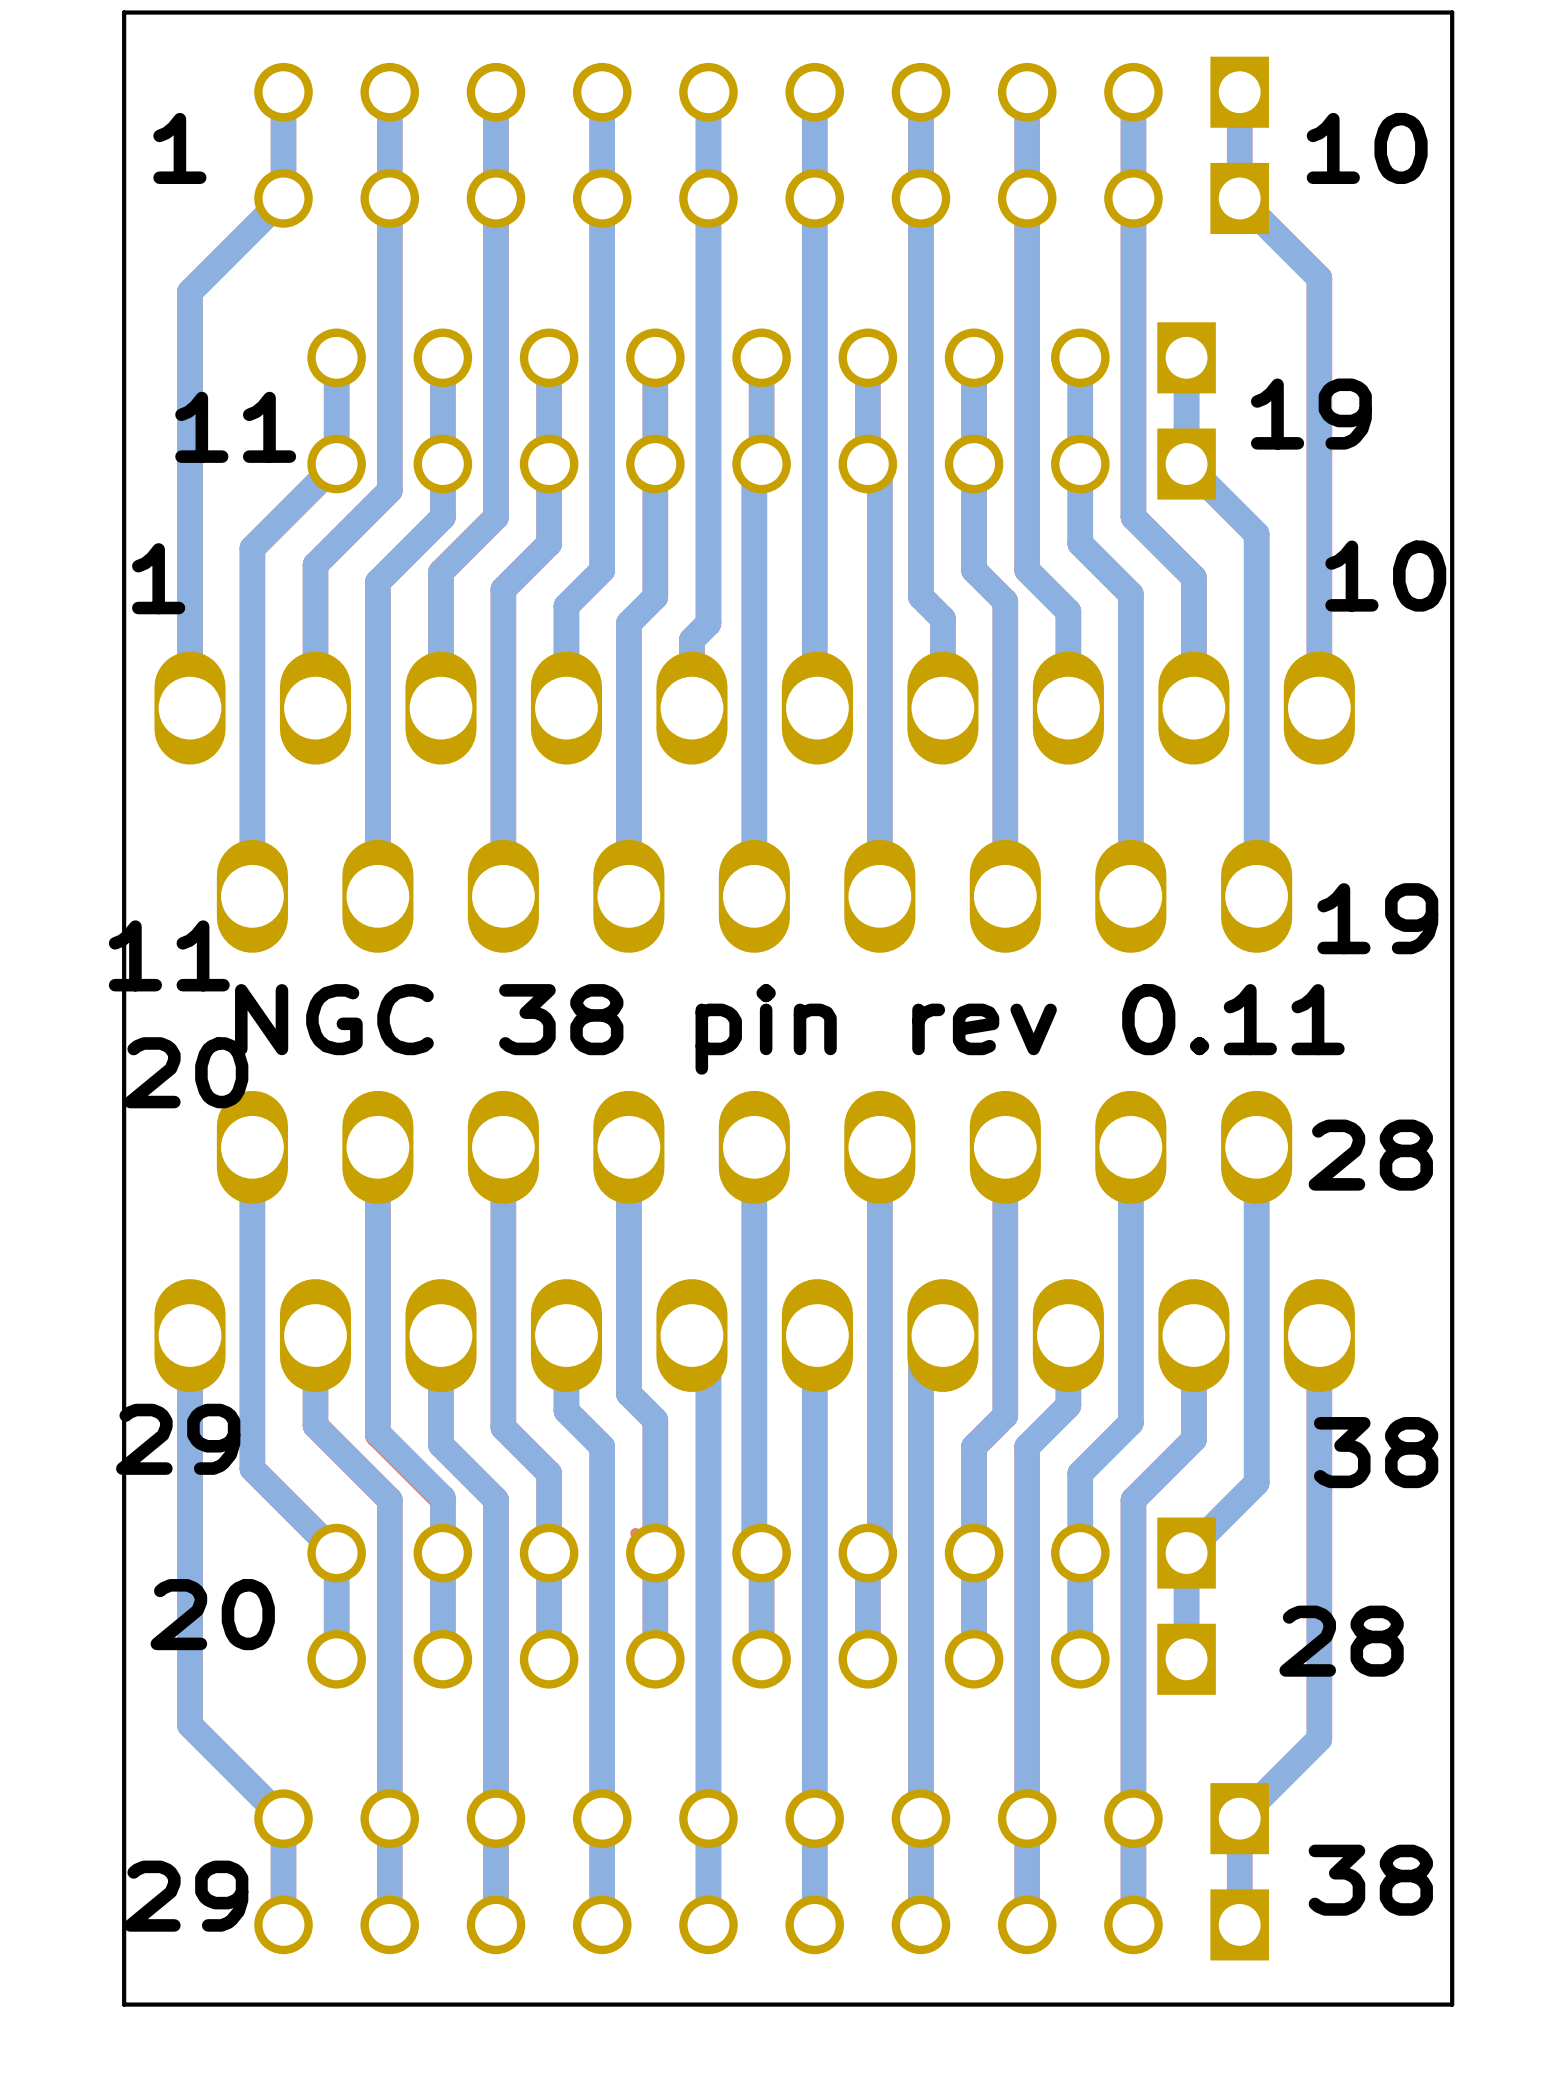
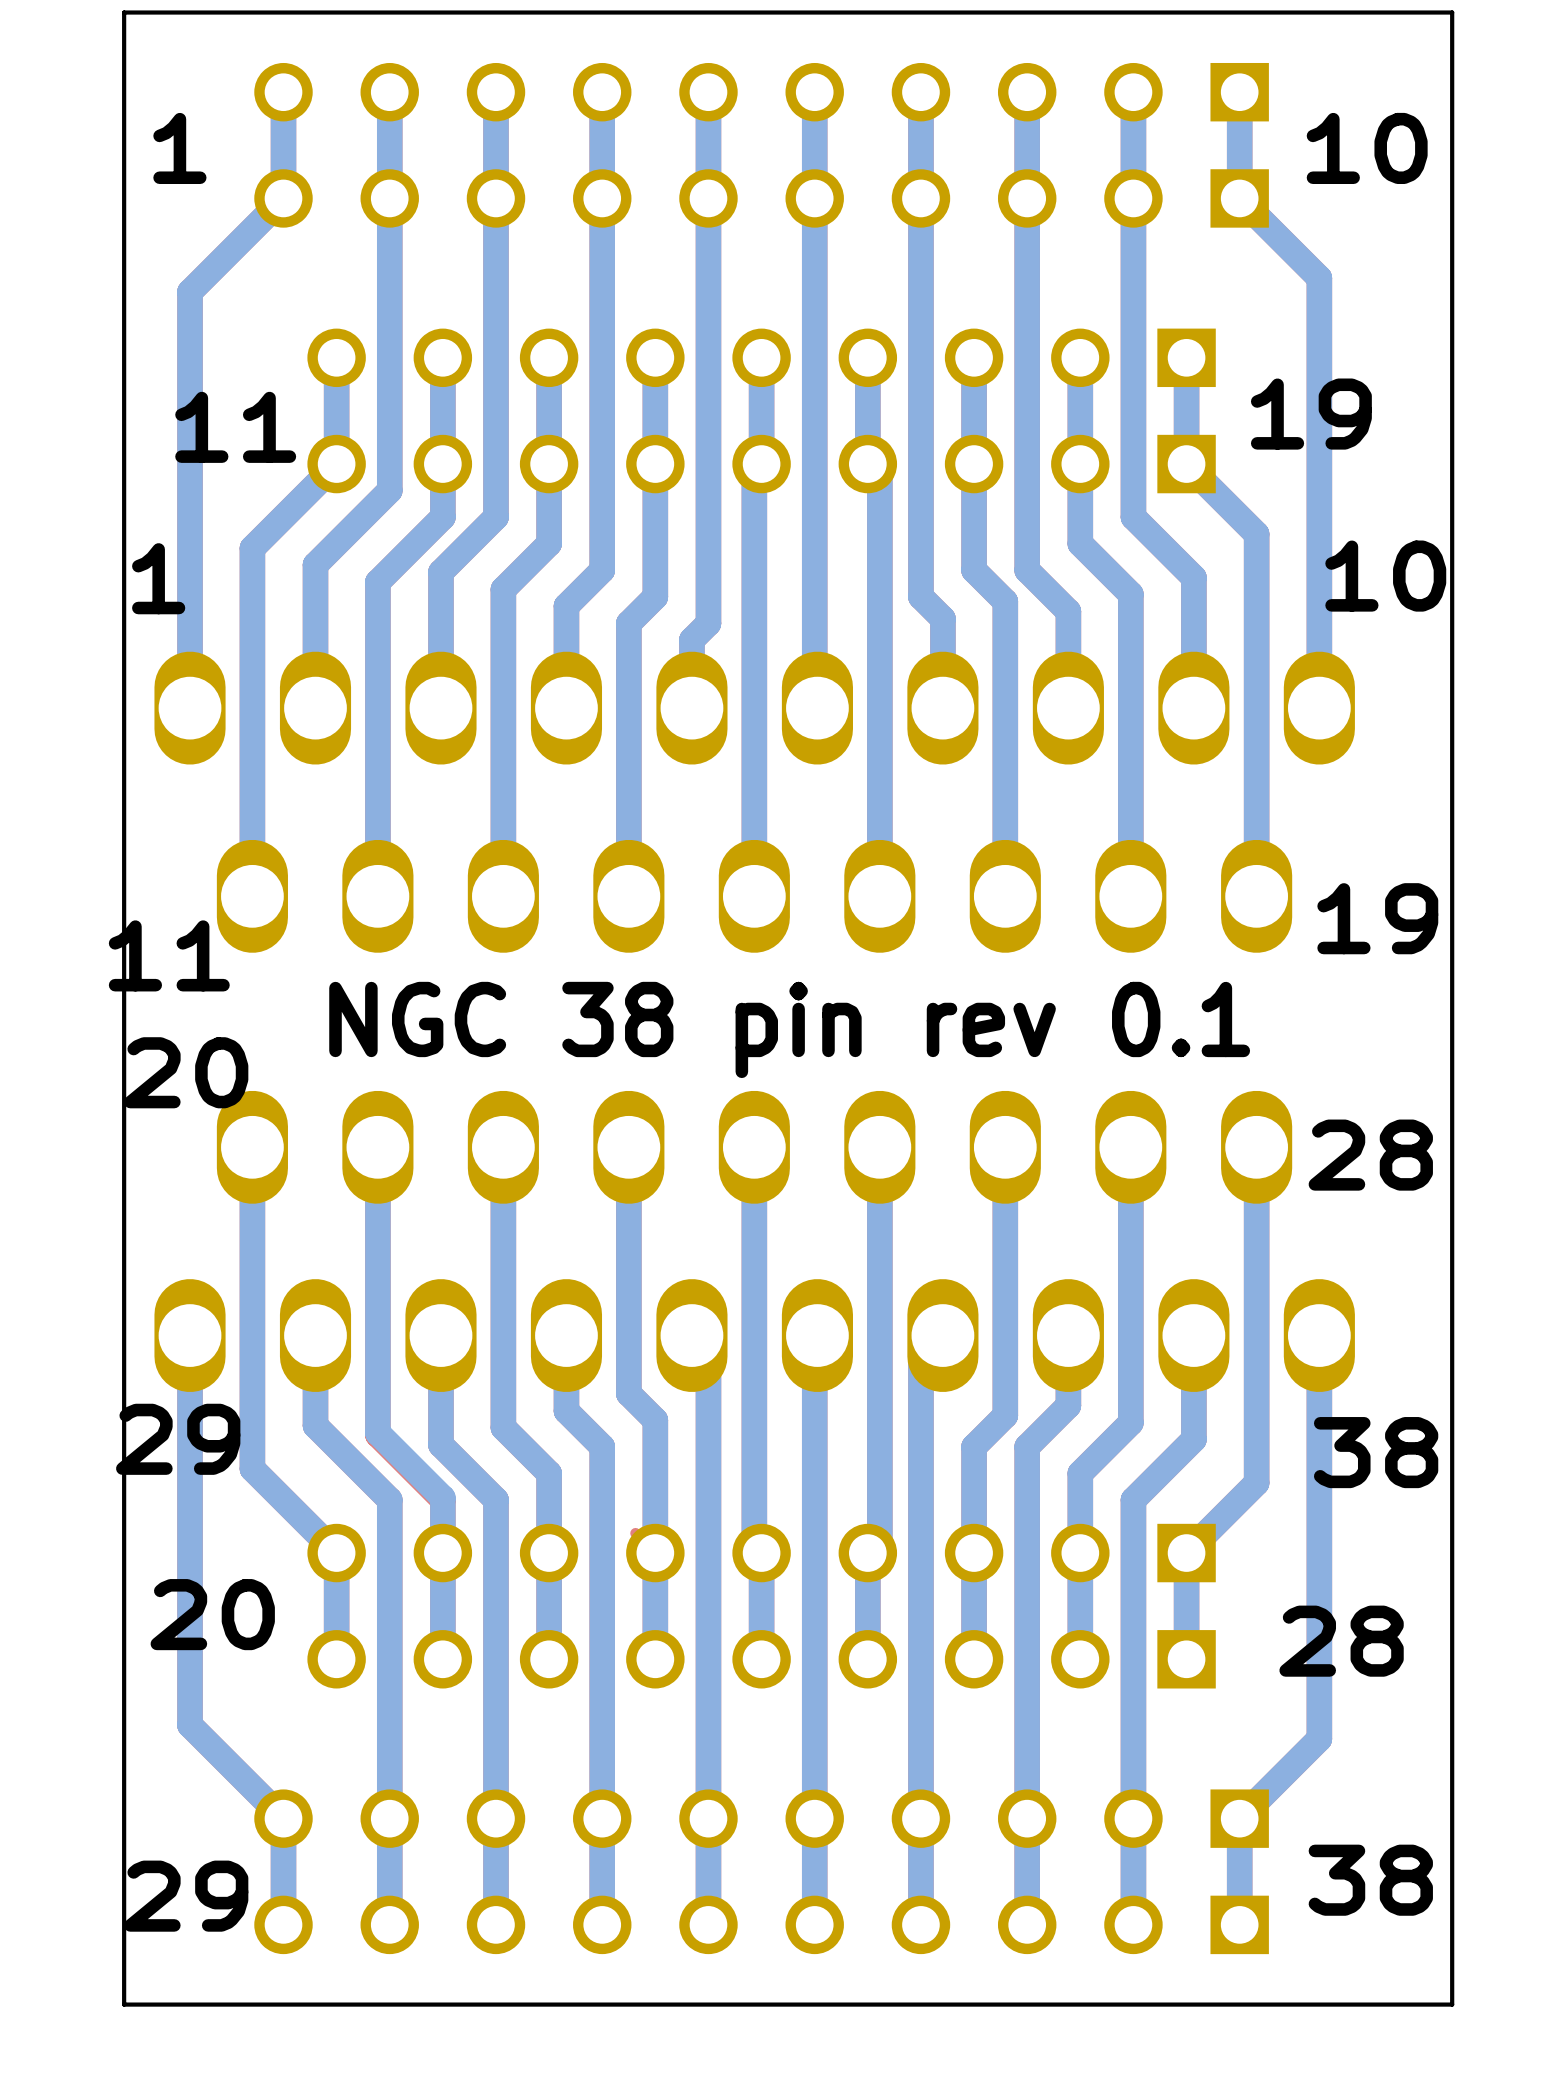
part footprint: [254, 56, 1269, 128] -> [254, 62, 1269, 122]
part footprint: [254, 162, 1269, 235] -> [254, 169, 1269, 228]
part footprint: [307, 322, 1216, 394] -> [307, 328, 1216, 388]
part footprint: [307, 428, 1216, 500] -> [307, 434, 1216, 494]
text: NGC 38 pin rev 0.11 (789, 1029) -> NGC 38 pin rev 0.1 (789, 1029)
part footprint: [307, 1517, 1216, 1589] -> [307, 1523, 1216, 1583]
part footprint: [307, 1623, 1216, 1695] -> [307, 1630, 1216, 1689]
part footprint: [254, 1783, 1269, 1855] -> [254, 1789, 1269, 1848]
part footprint: [254, 1889, 1269, 1961] -> [254, 1895, 1269, 1955]

